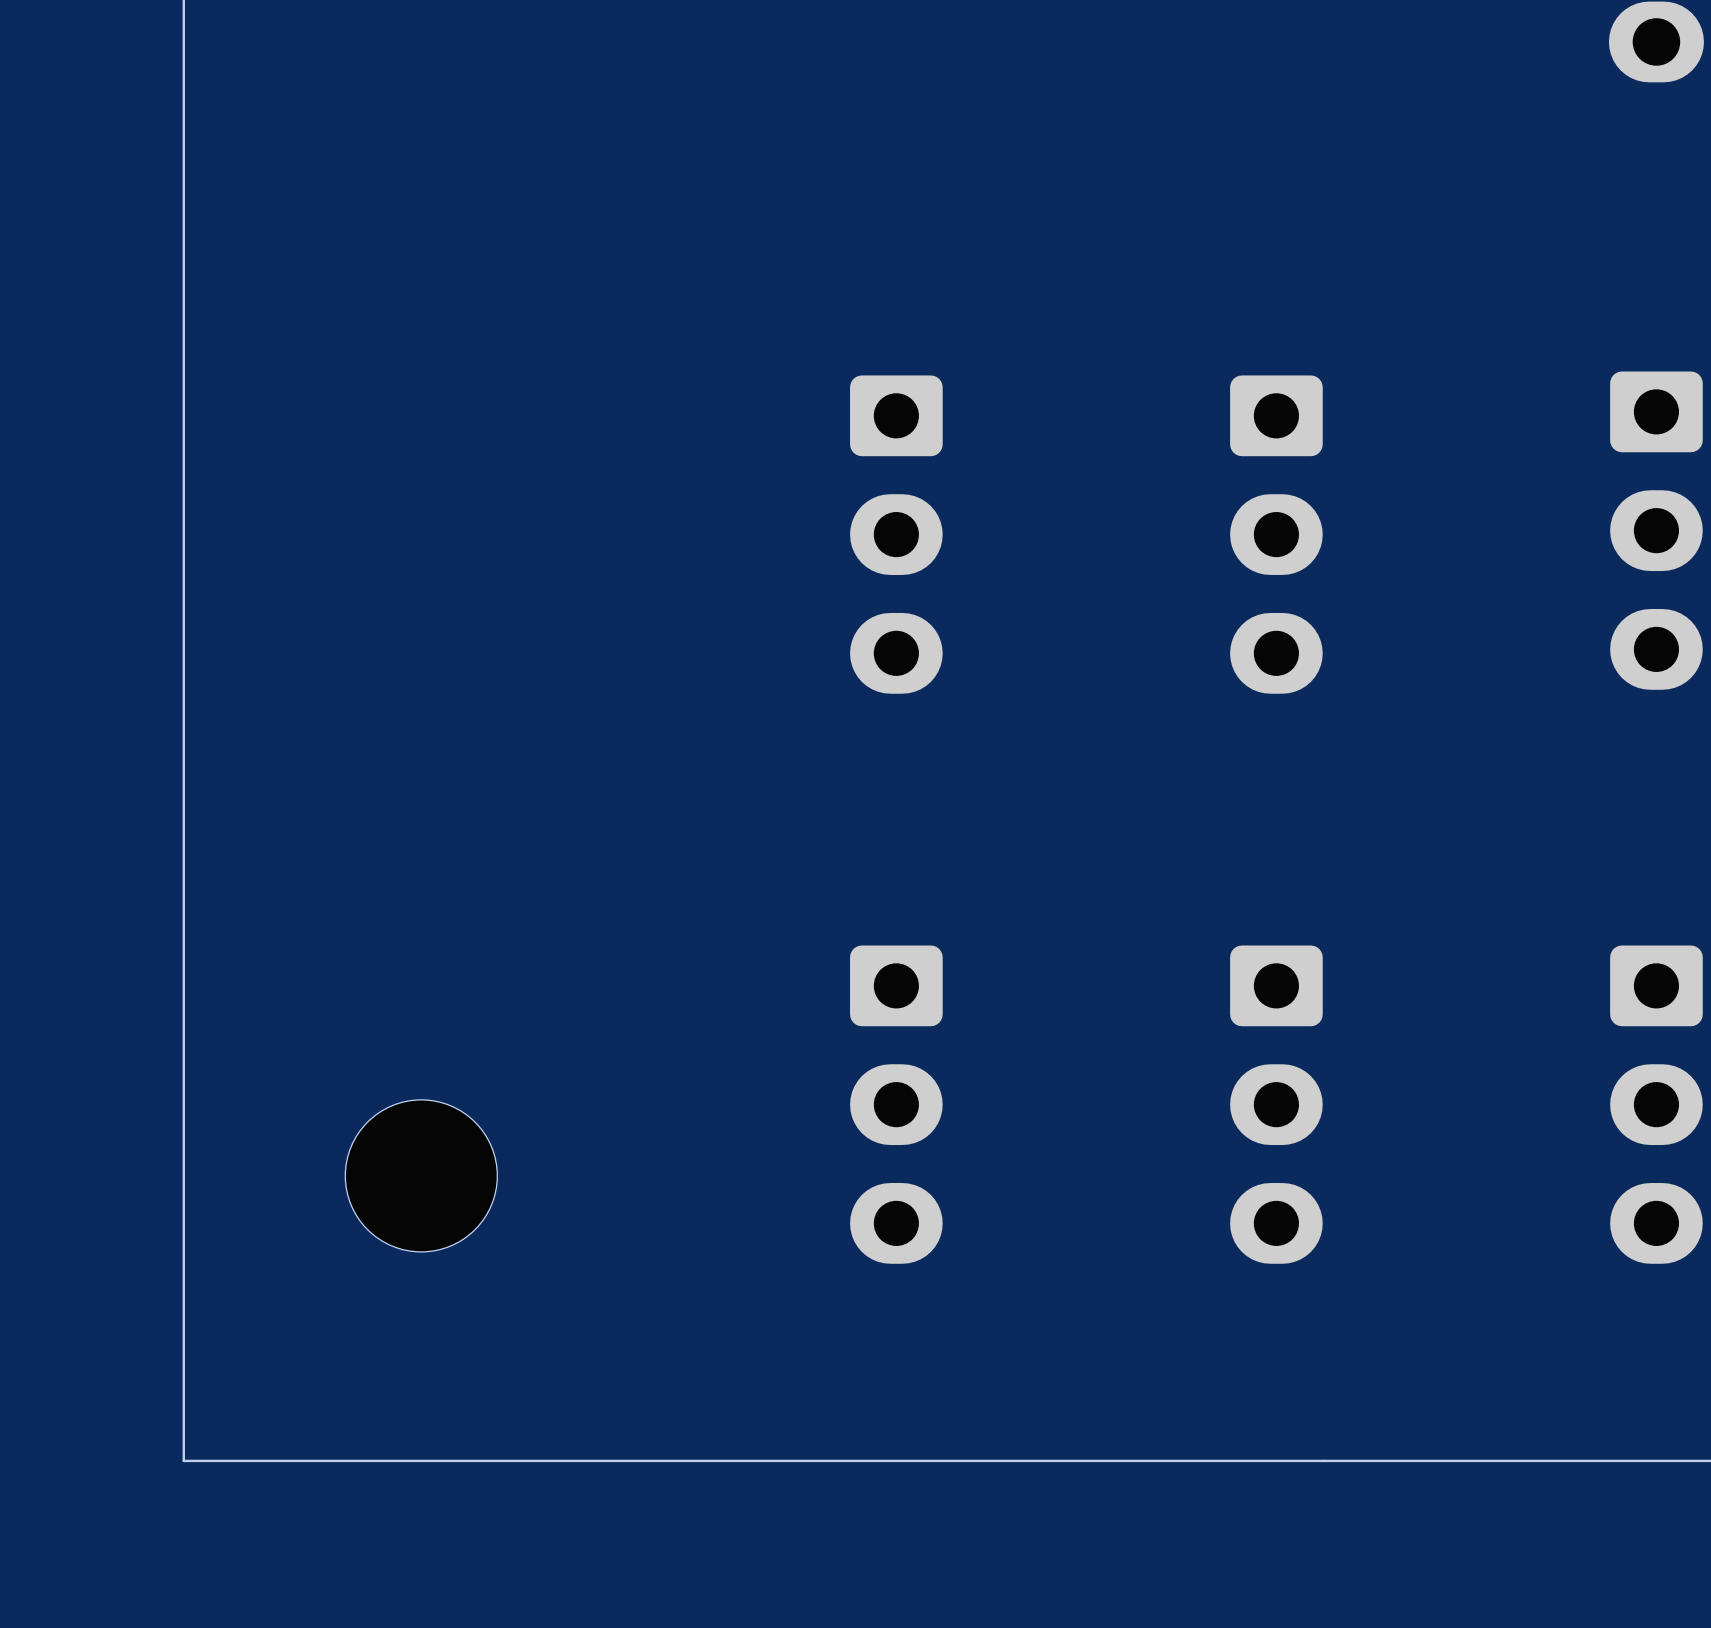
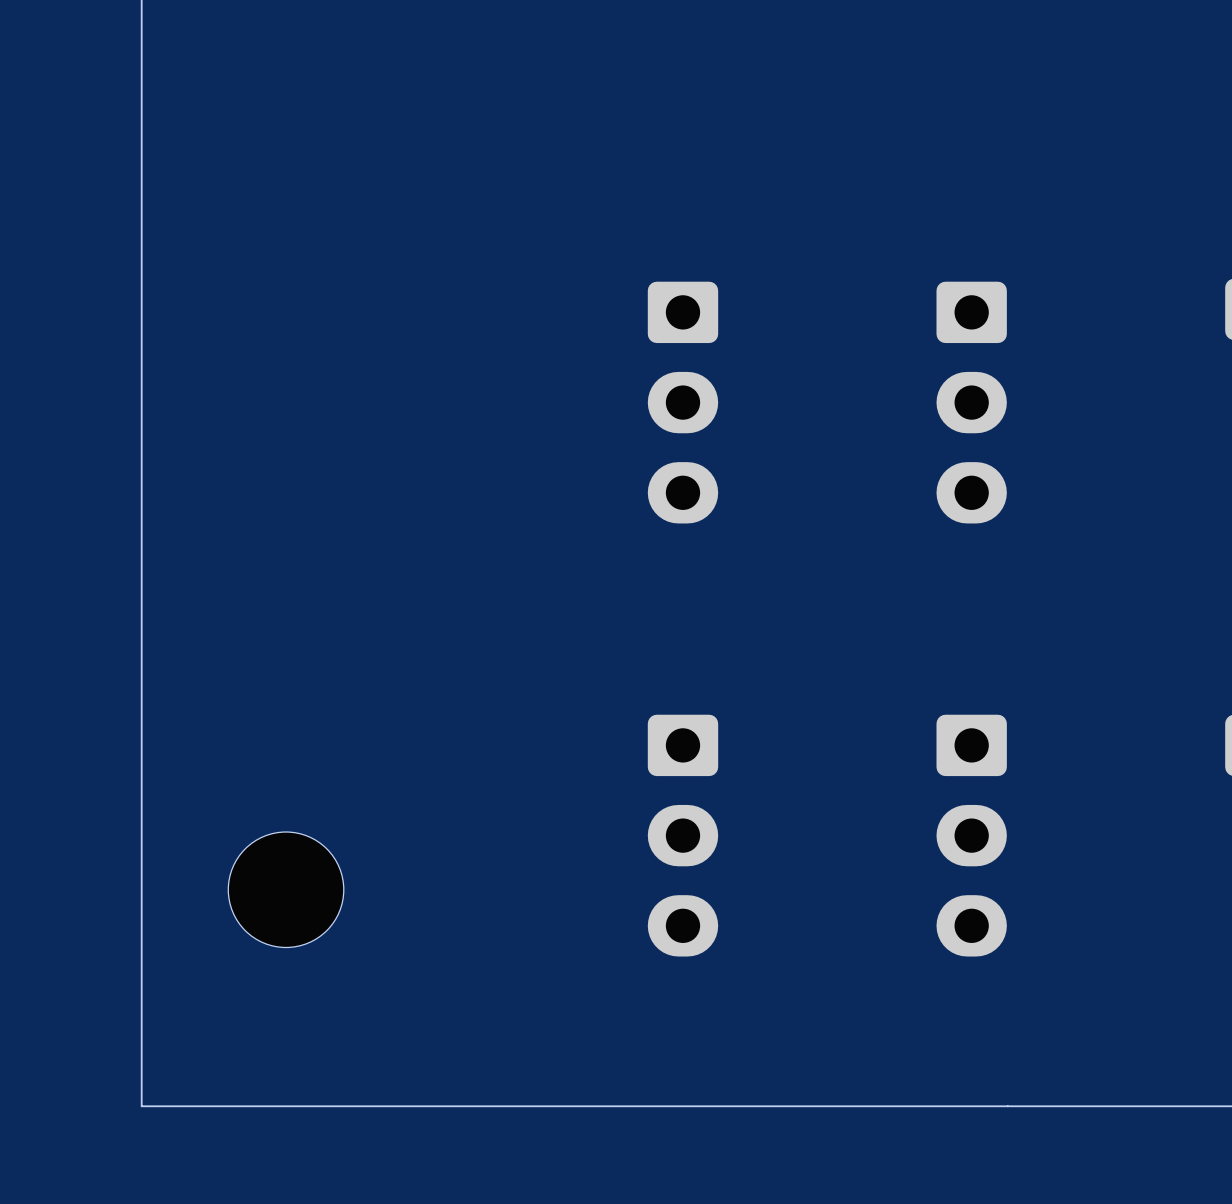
part position: (421, 1175) -> (286, 889)

